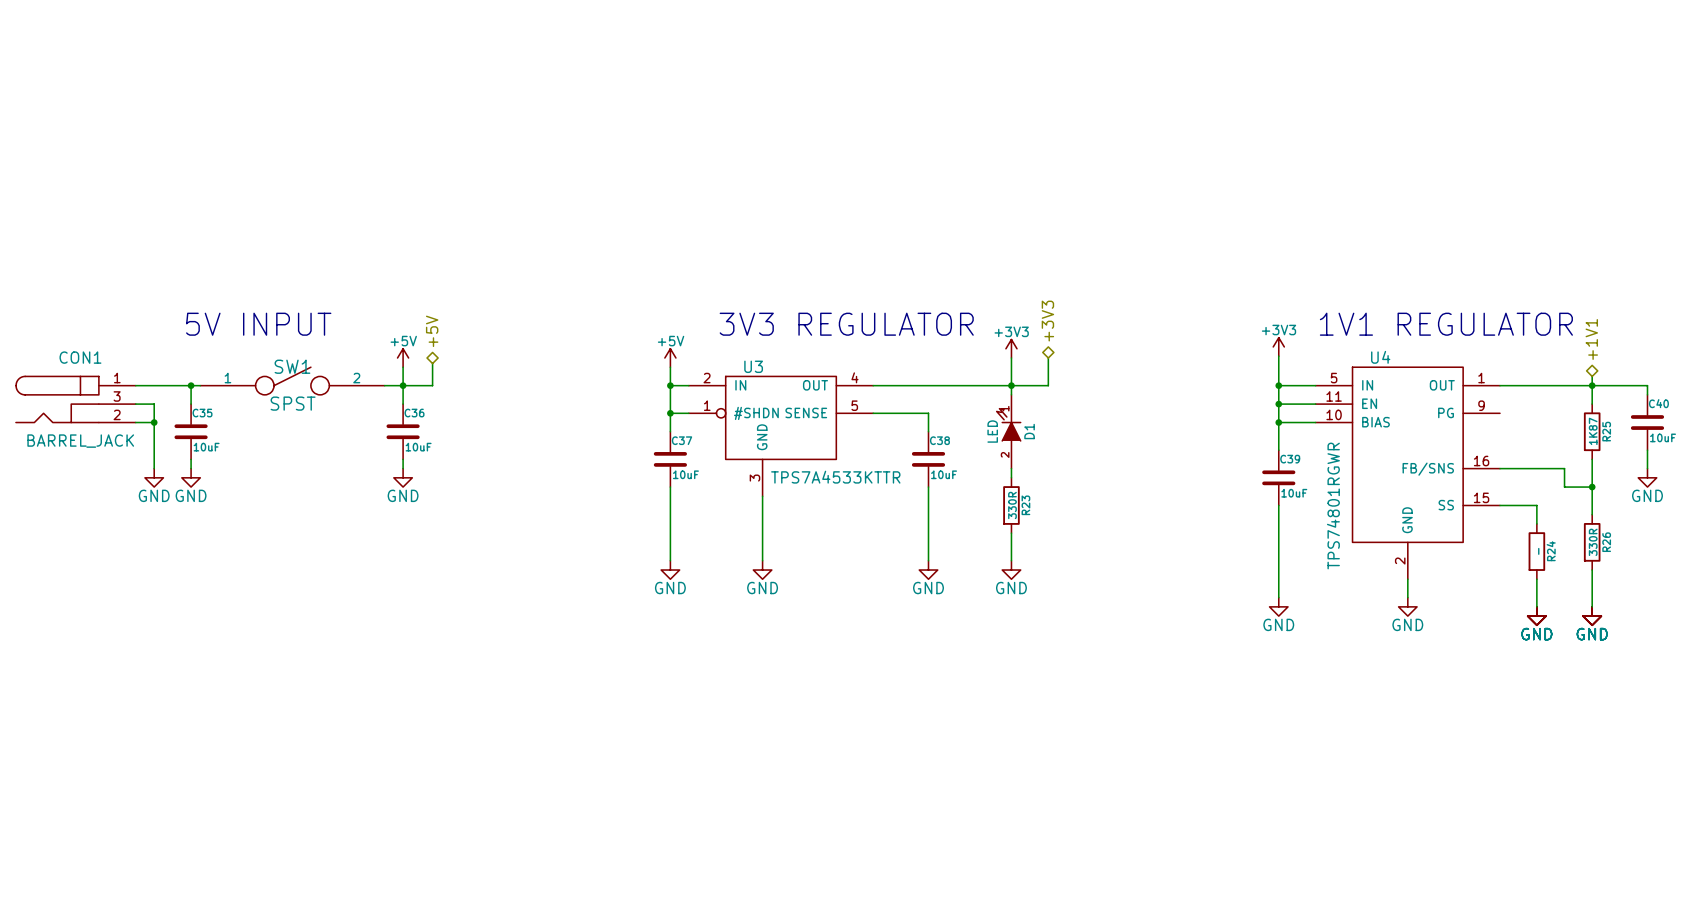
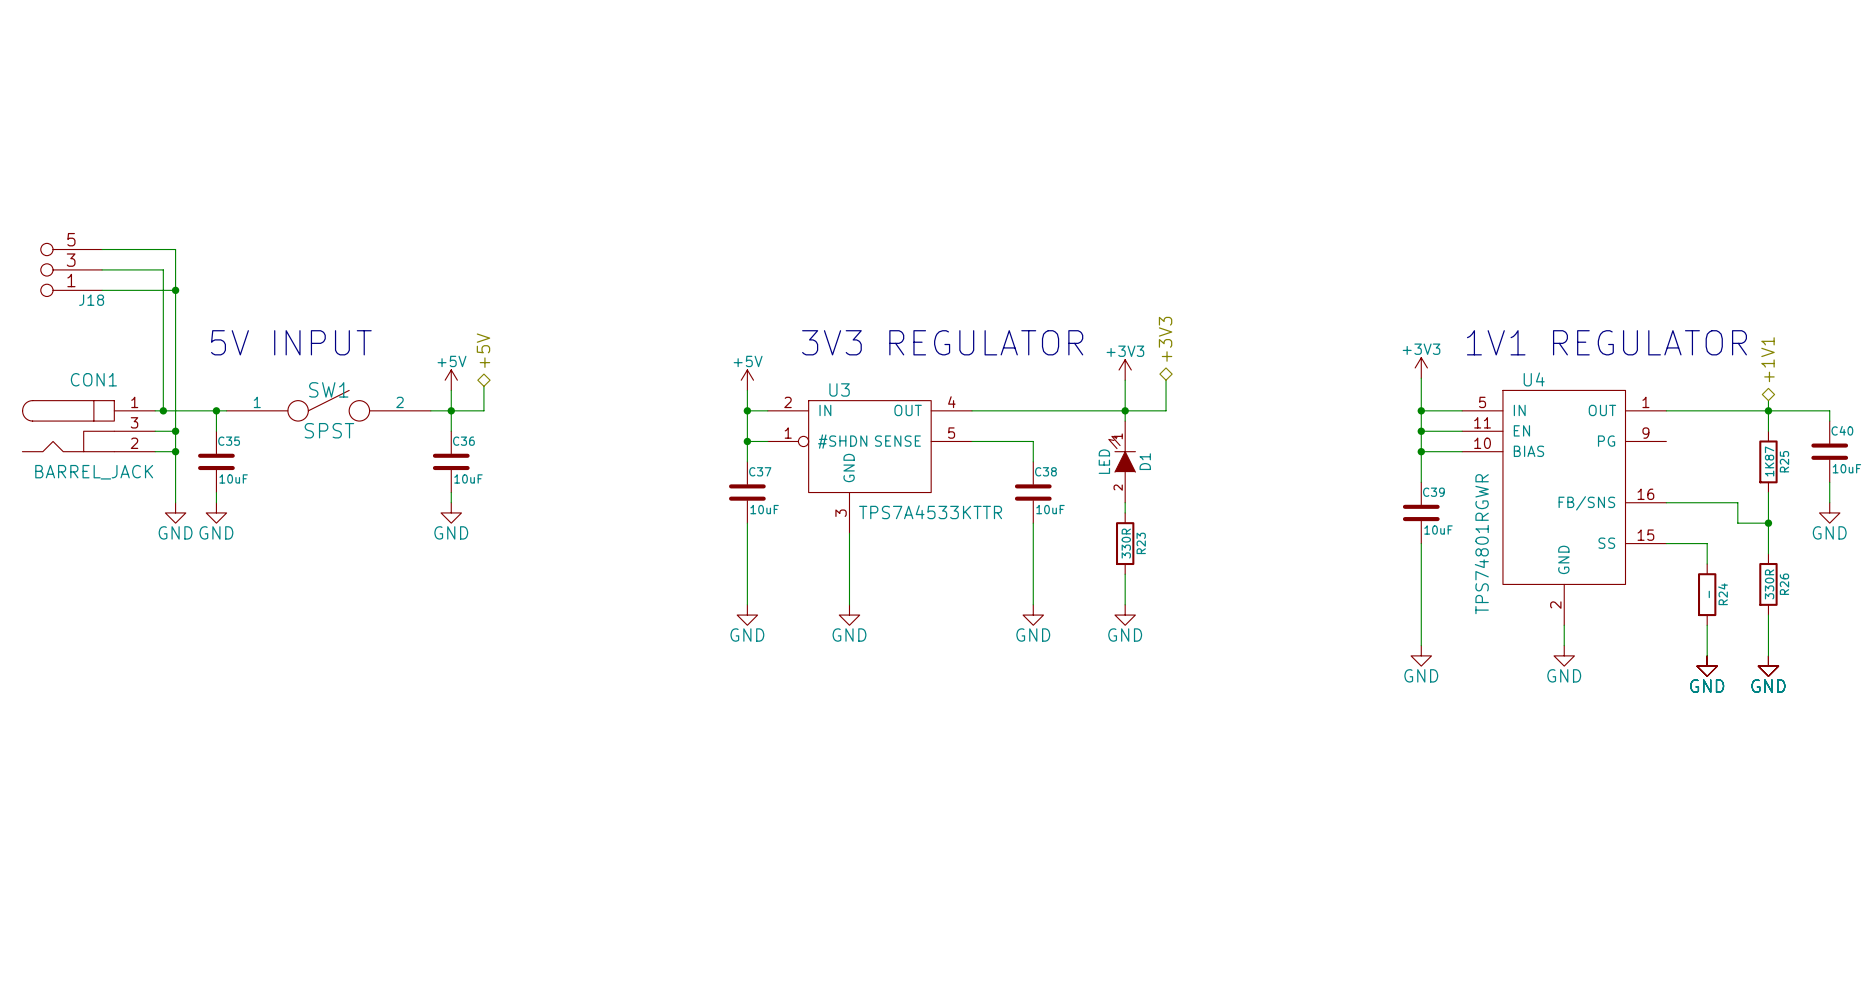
wire: none -> (102, 249) (175, 249) (175, 431)
J18: none -> (71, 269)
wire: none -> (102, 269) (163, 269) (163, 410)
wire: none -> (102, 290) (175, 290)
junction: none -> (175, 290)
junction: none -> (163, 410)
junction: none -> (175, 431)

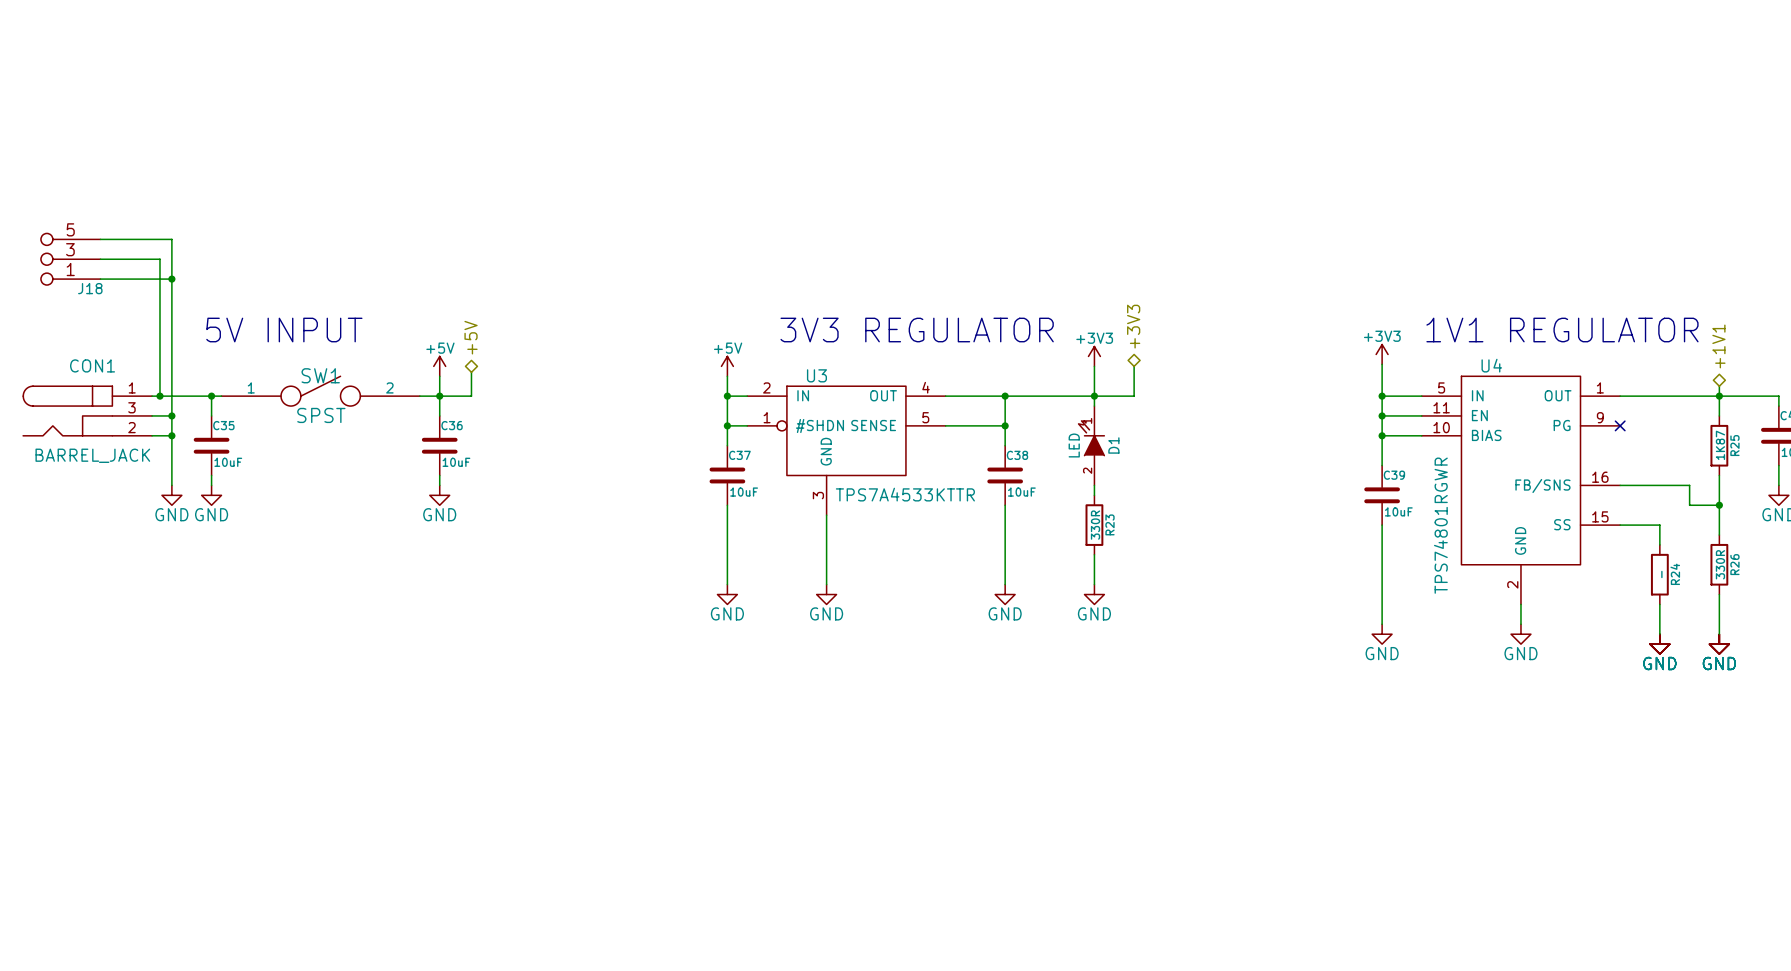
wire: none -> (1005, 396) (1005, 425)
junction: none -> (1005, 396)
junction: none -> (1005, 425)
no-connect mark: none -> (1620, 425)

